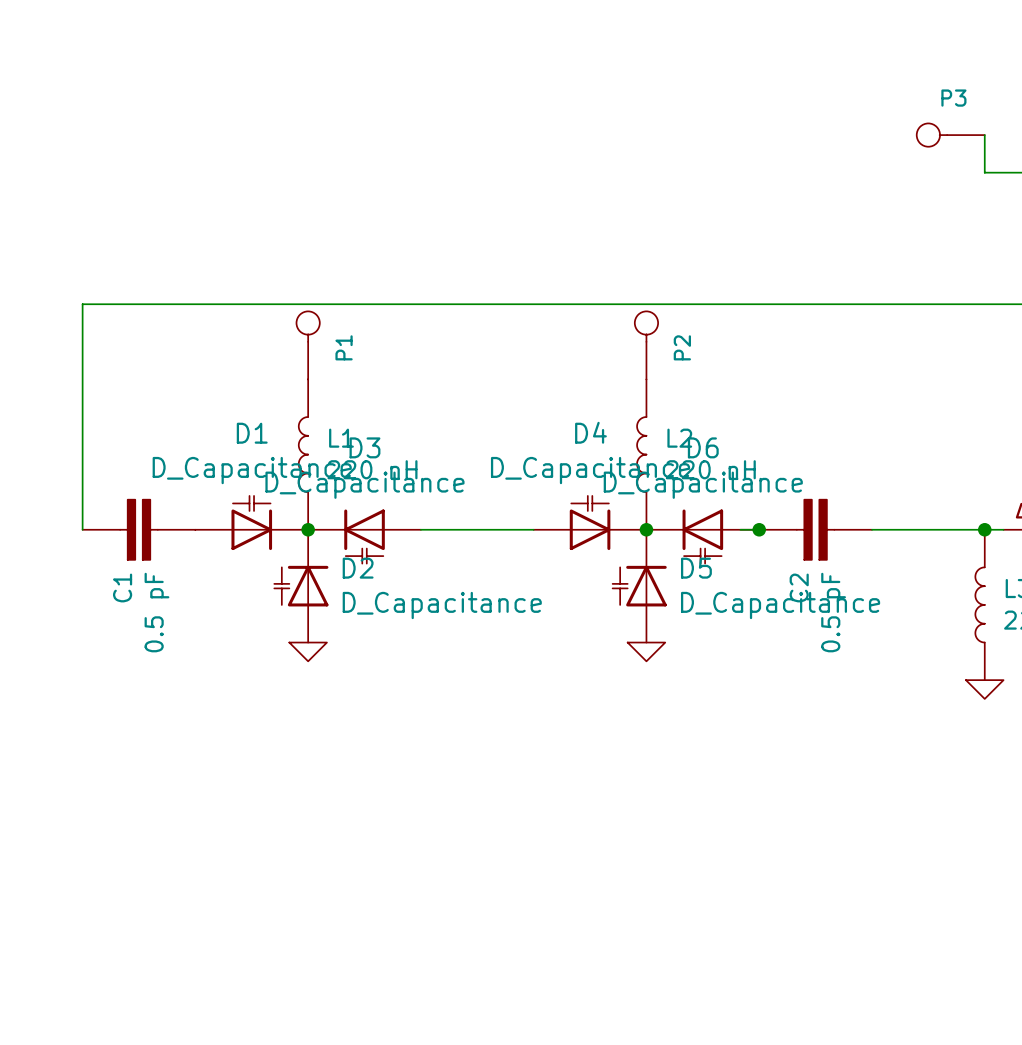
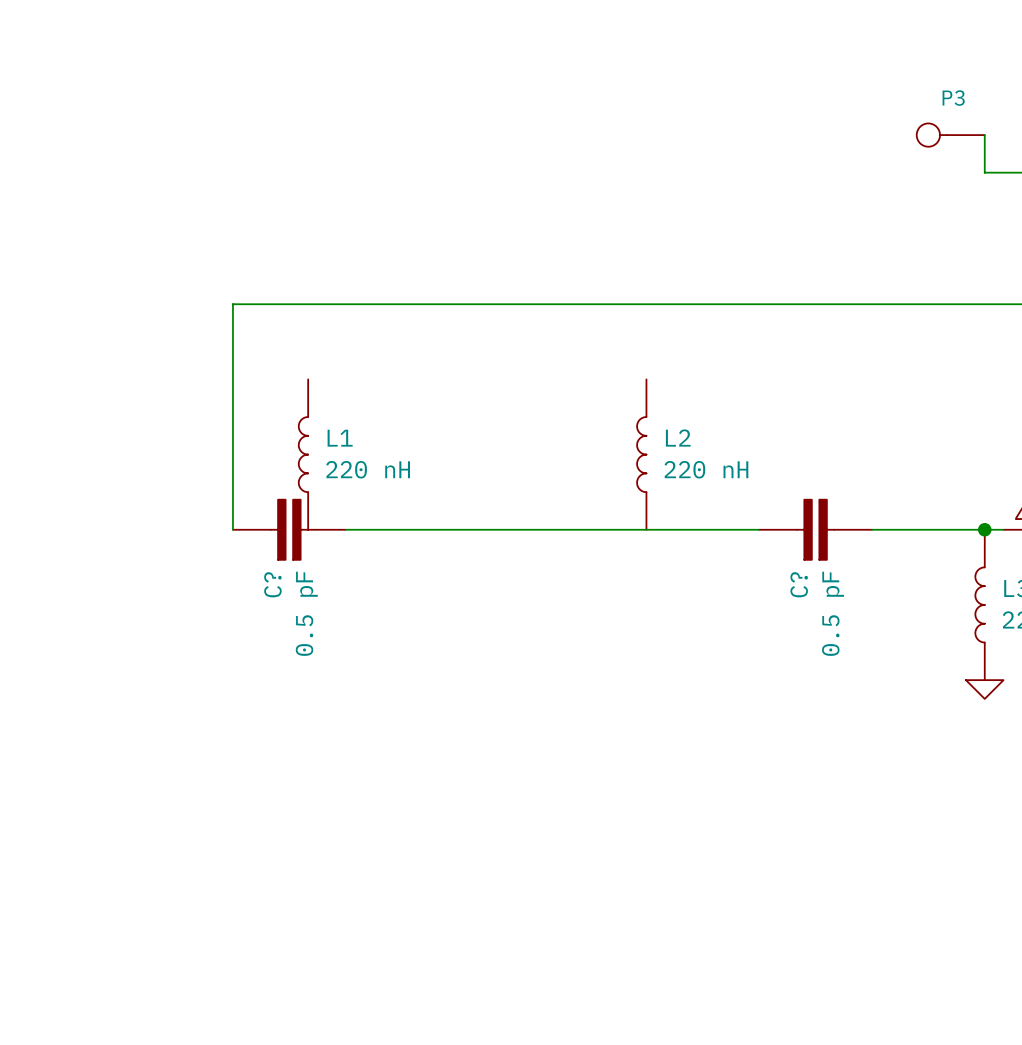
wire: (232, 304) (82, 304) (82, 529) -> (232, 304) (232, 529)
P1: (308, 345) -> none
P2: (646, 345) -> none
D1: D_Capacitance (251, 523) -> none
D4: D_Capacitance (590, 523) -> none
C1: 0.5 pF (138, 529) -> none
C?: none -> 0.5 pF (289, 529)
junction: (308, 529) -> none
junction: (646, 529) -> none
junction: (759, 529) -> none
D3: D_Capacitance (364, 536) -> none
D6: D_Capacitance (702, 536) -> none
D2: D_Capacitance (301, 586) -> none
D5: D_Capacitance (639, 586) -> none
C2 name: C2 (799, 587) -> C? (799, 584)
power symbol: (308, 651) -> none
power symbol: (646, 651) -> none

